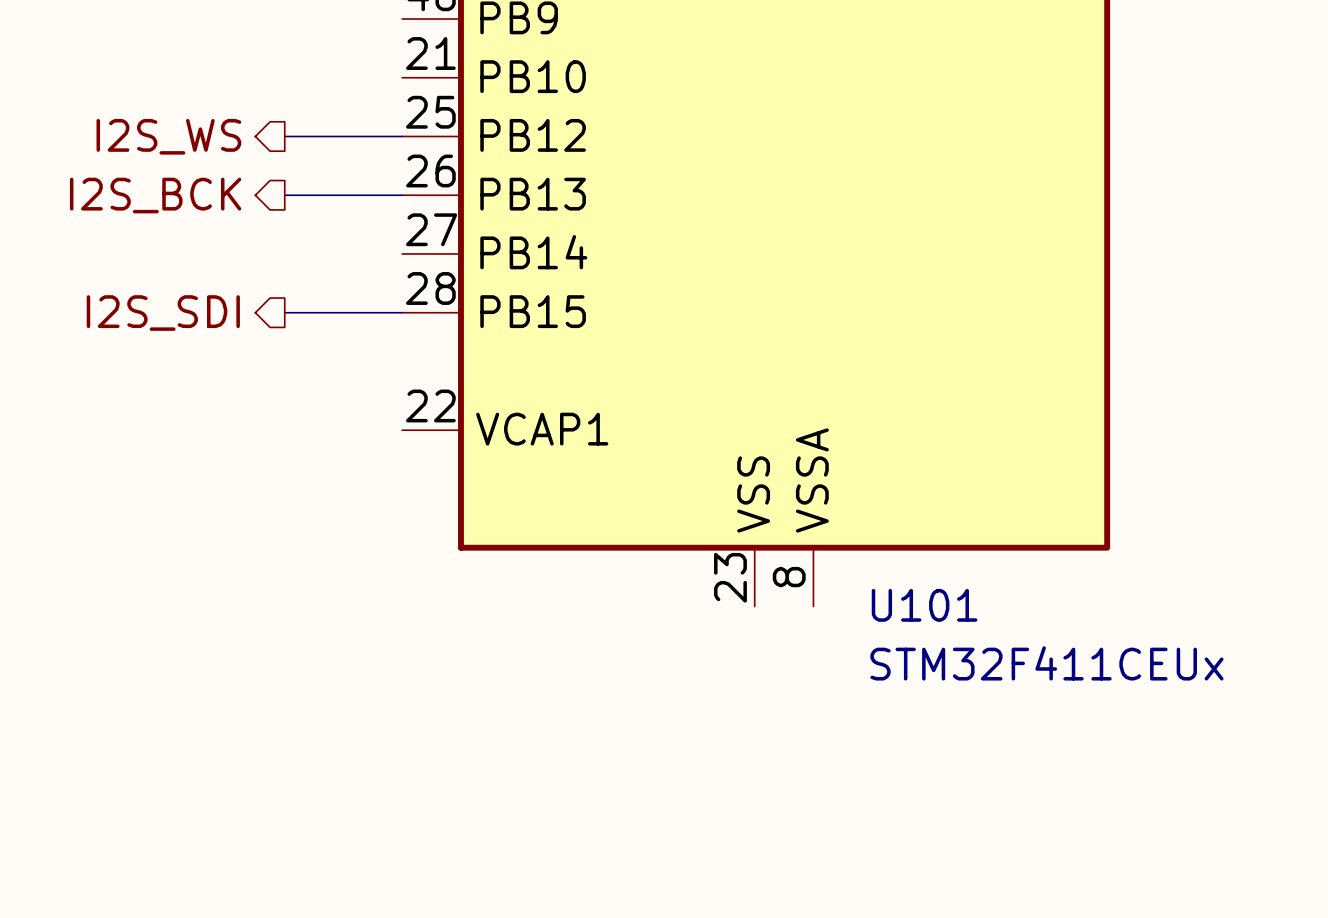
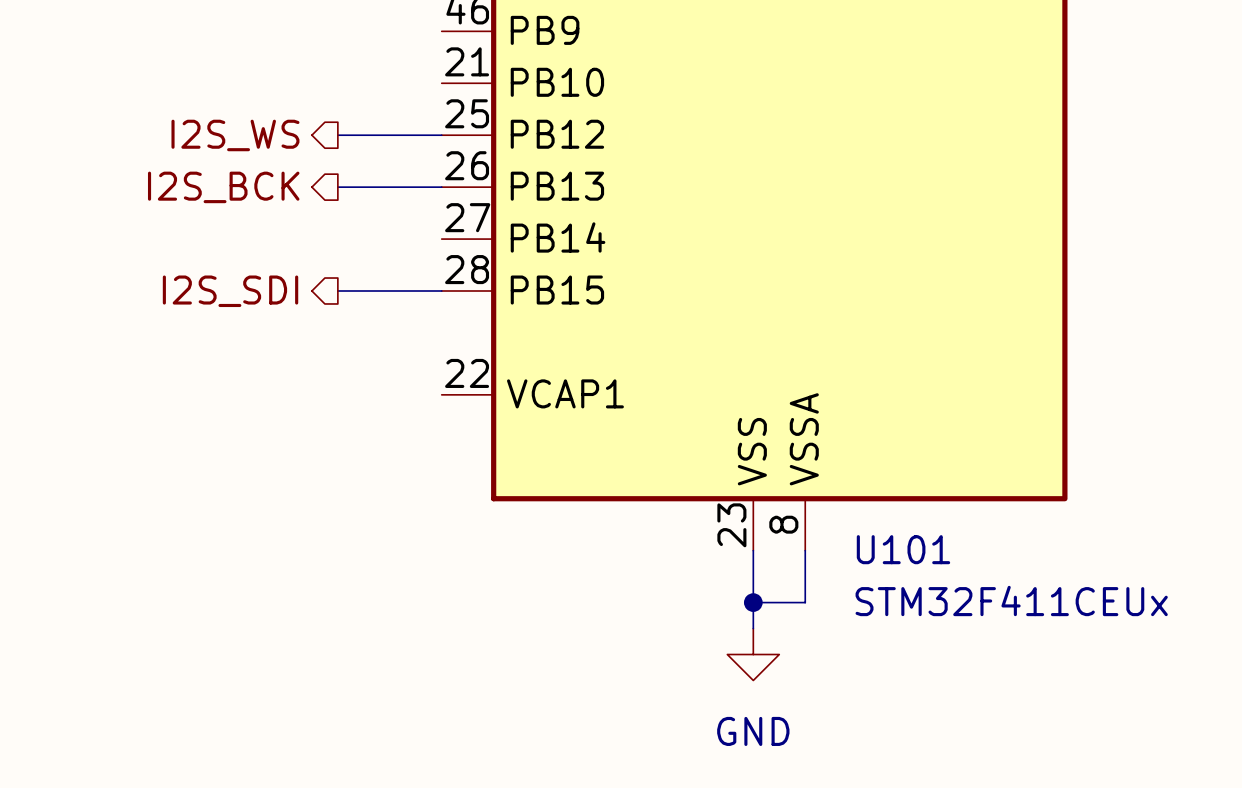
wire: none -> (753, 550) (753, 628)
wire: none -> (805, 550) (805, 602) (753, 602)
junction: none -> (753, 602)
power symbol: none -> GND (753, 654)

